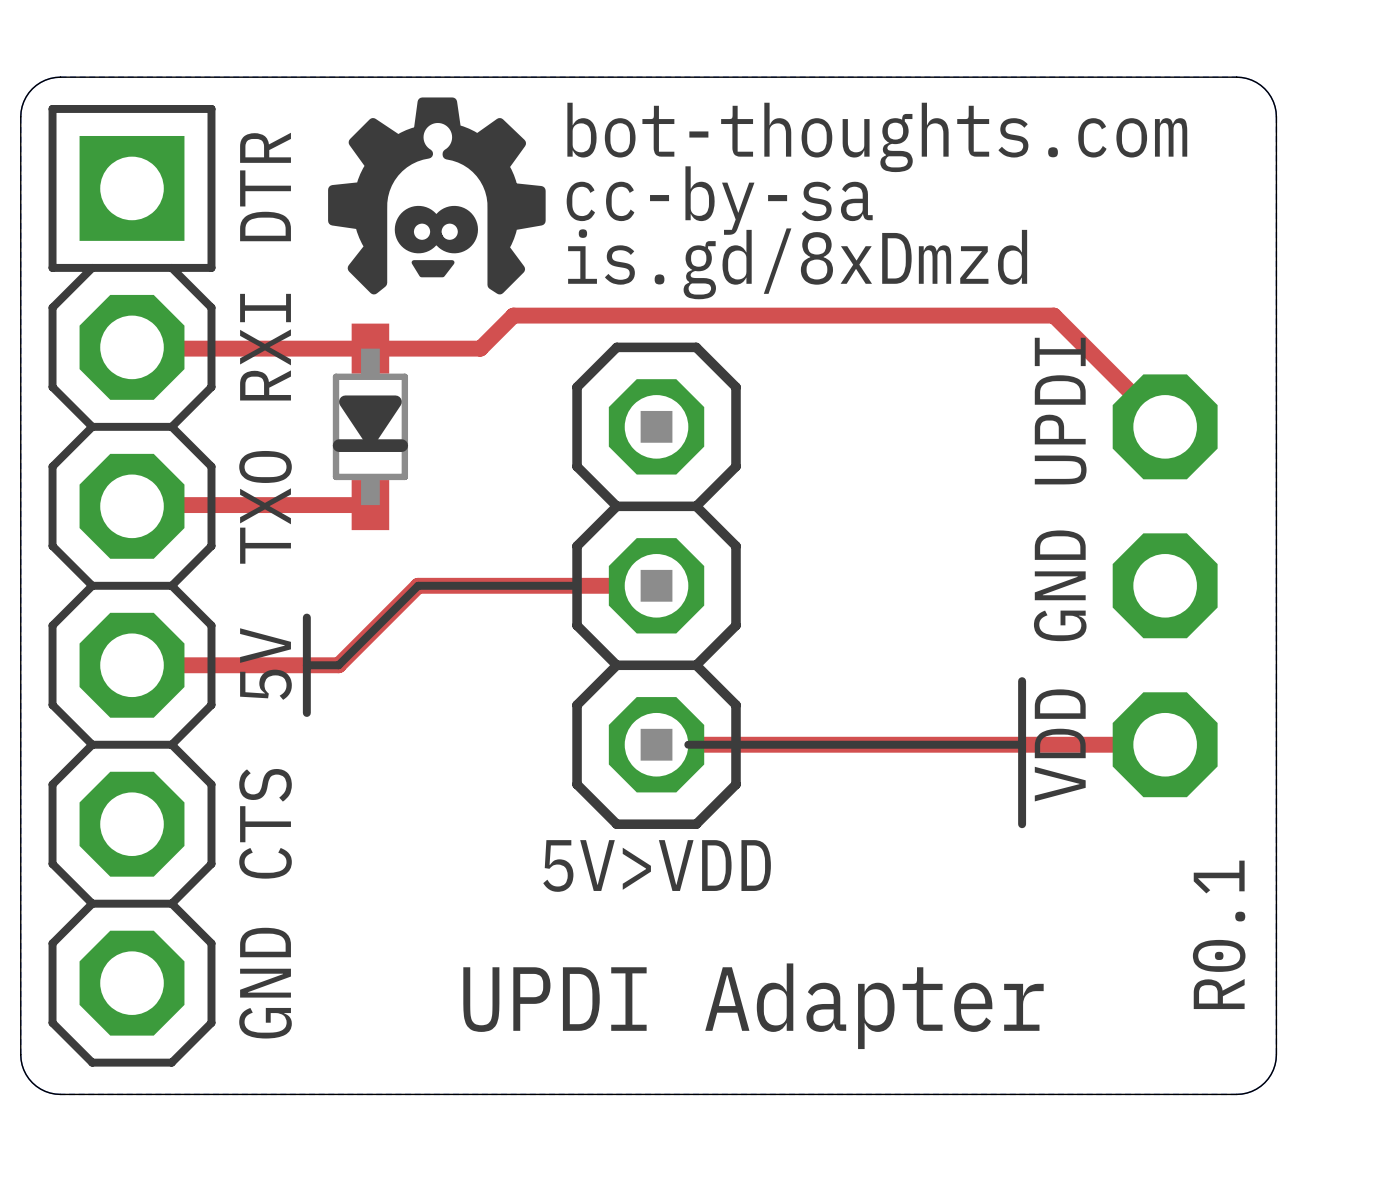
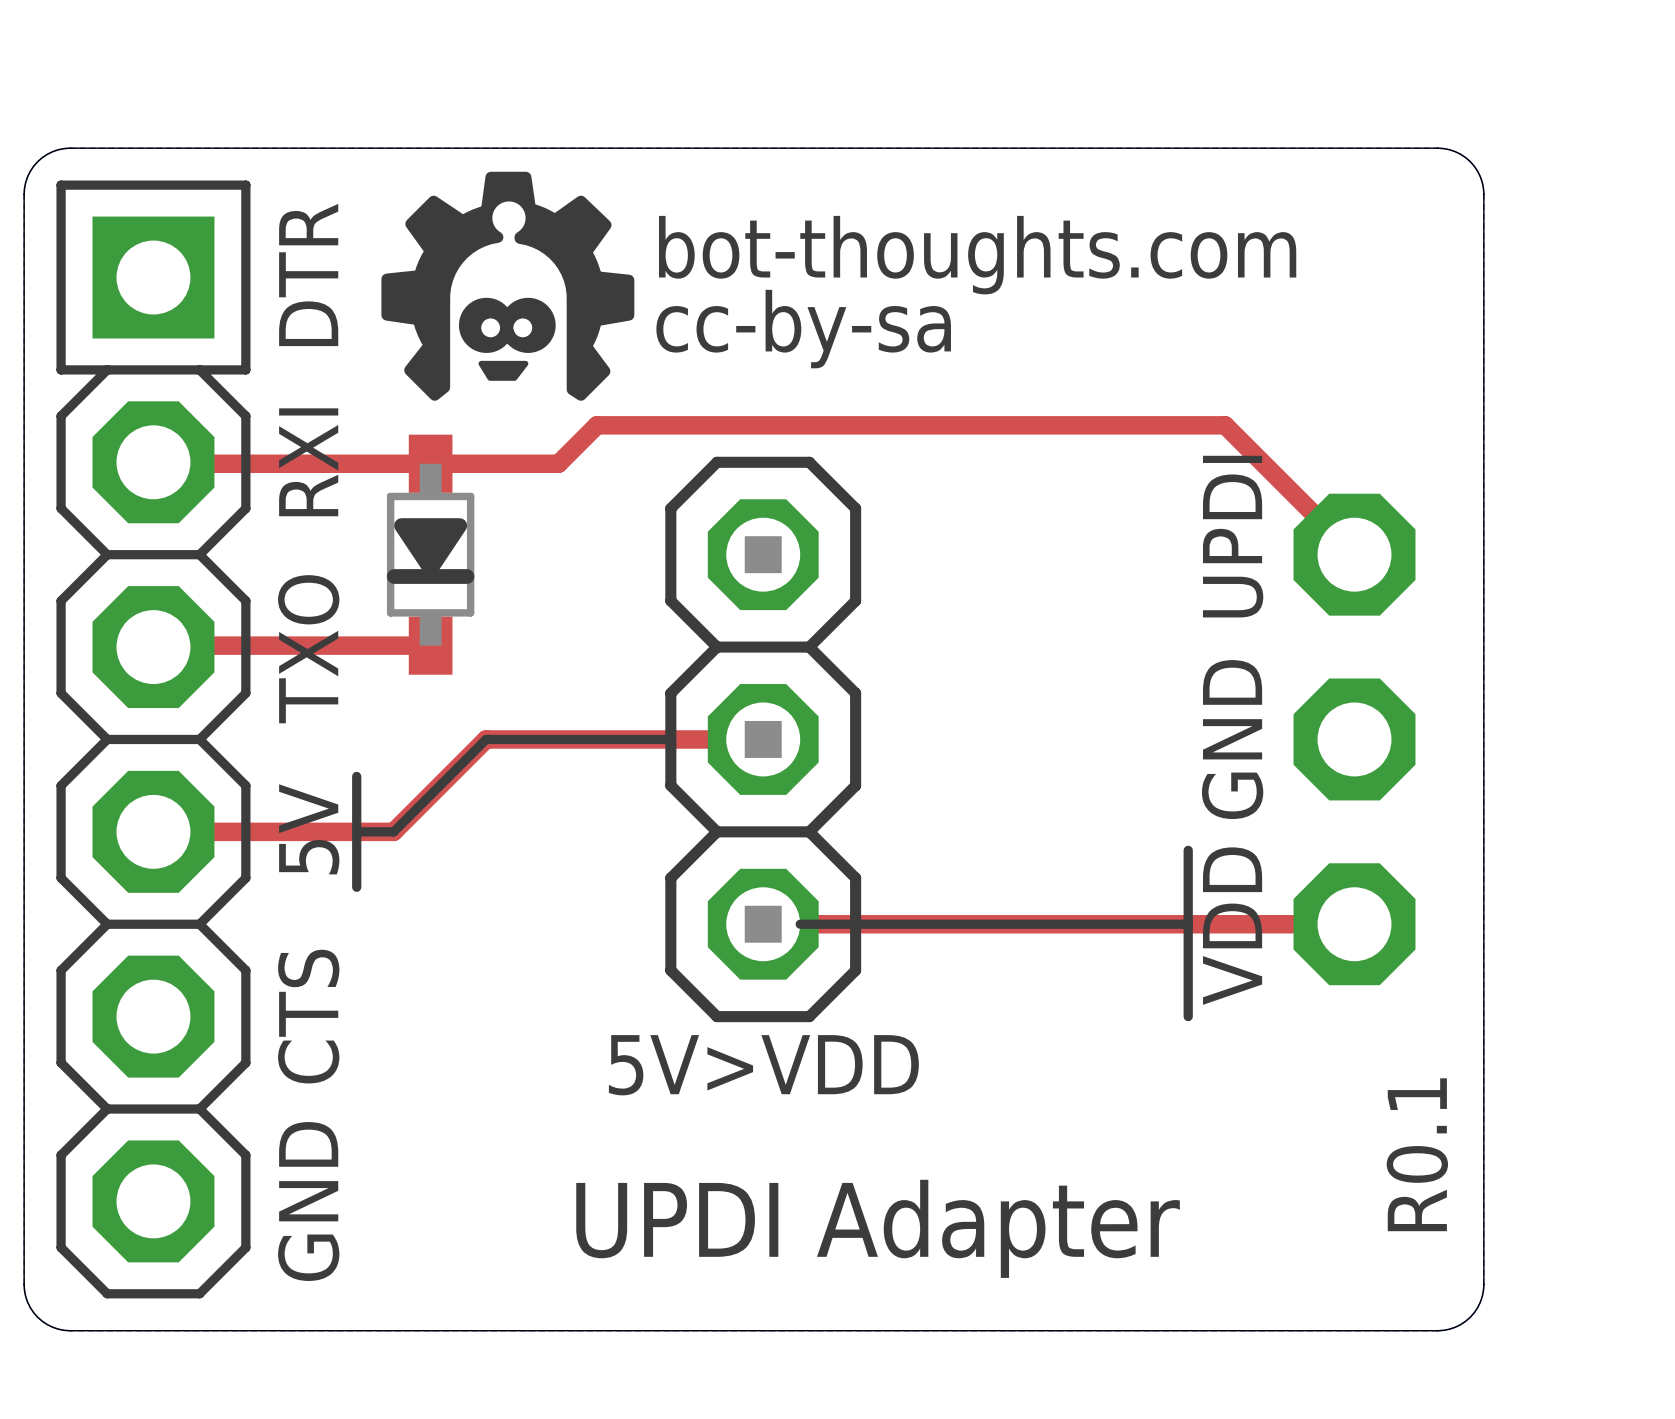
text position: bot-thoughts.com (877, 137) -> bot-thoughts.com (977, 255)
text position: cc-by-sa (719, 200) -> cc-by-sa (803, 329)
text: is.gd/8xDmzd (797, 263) -> none

